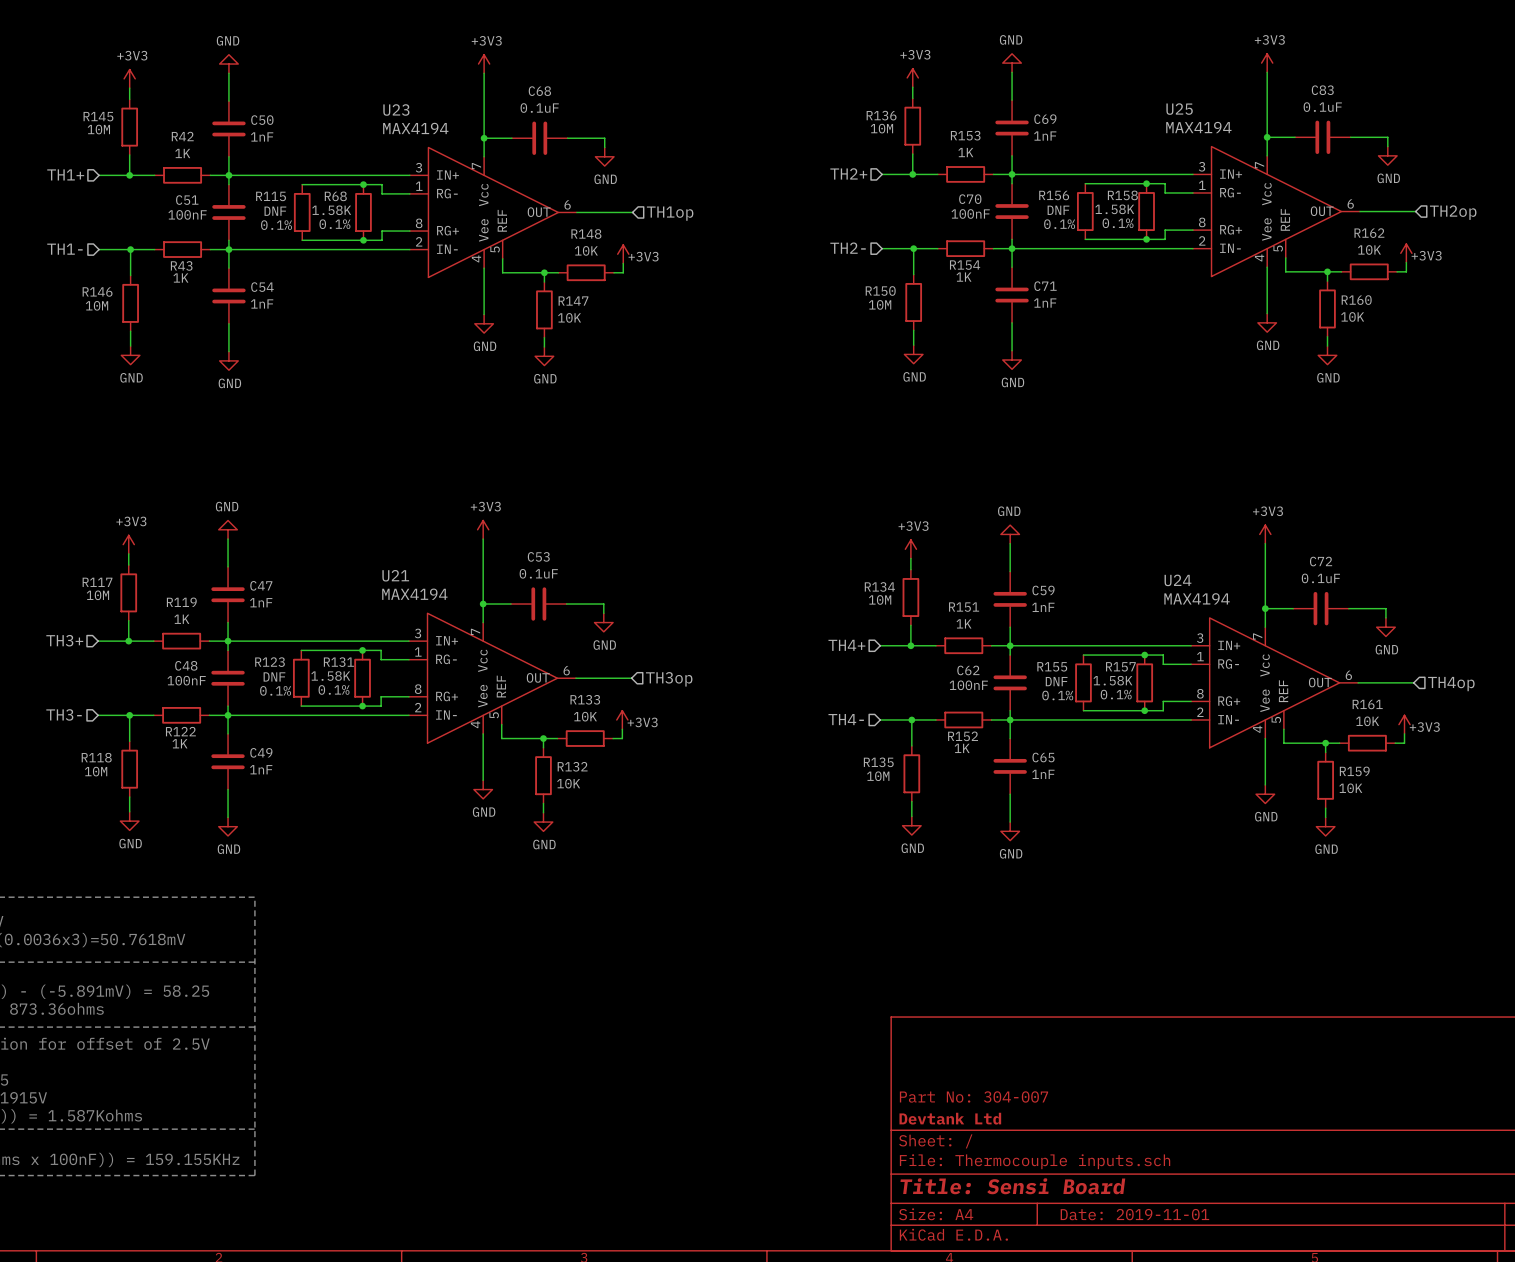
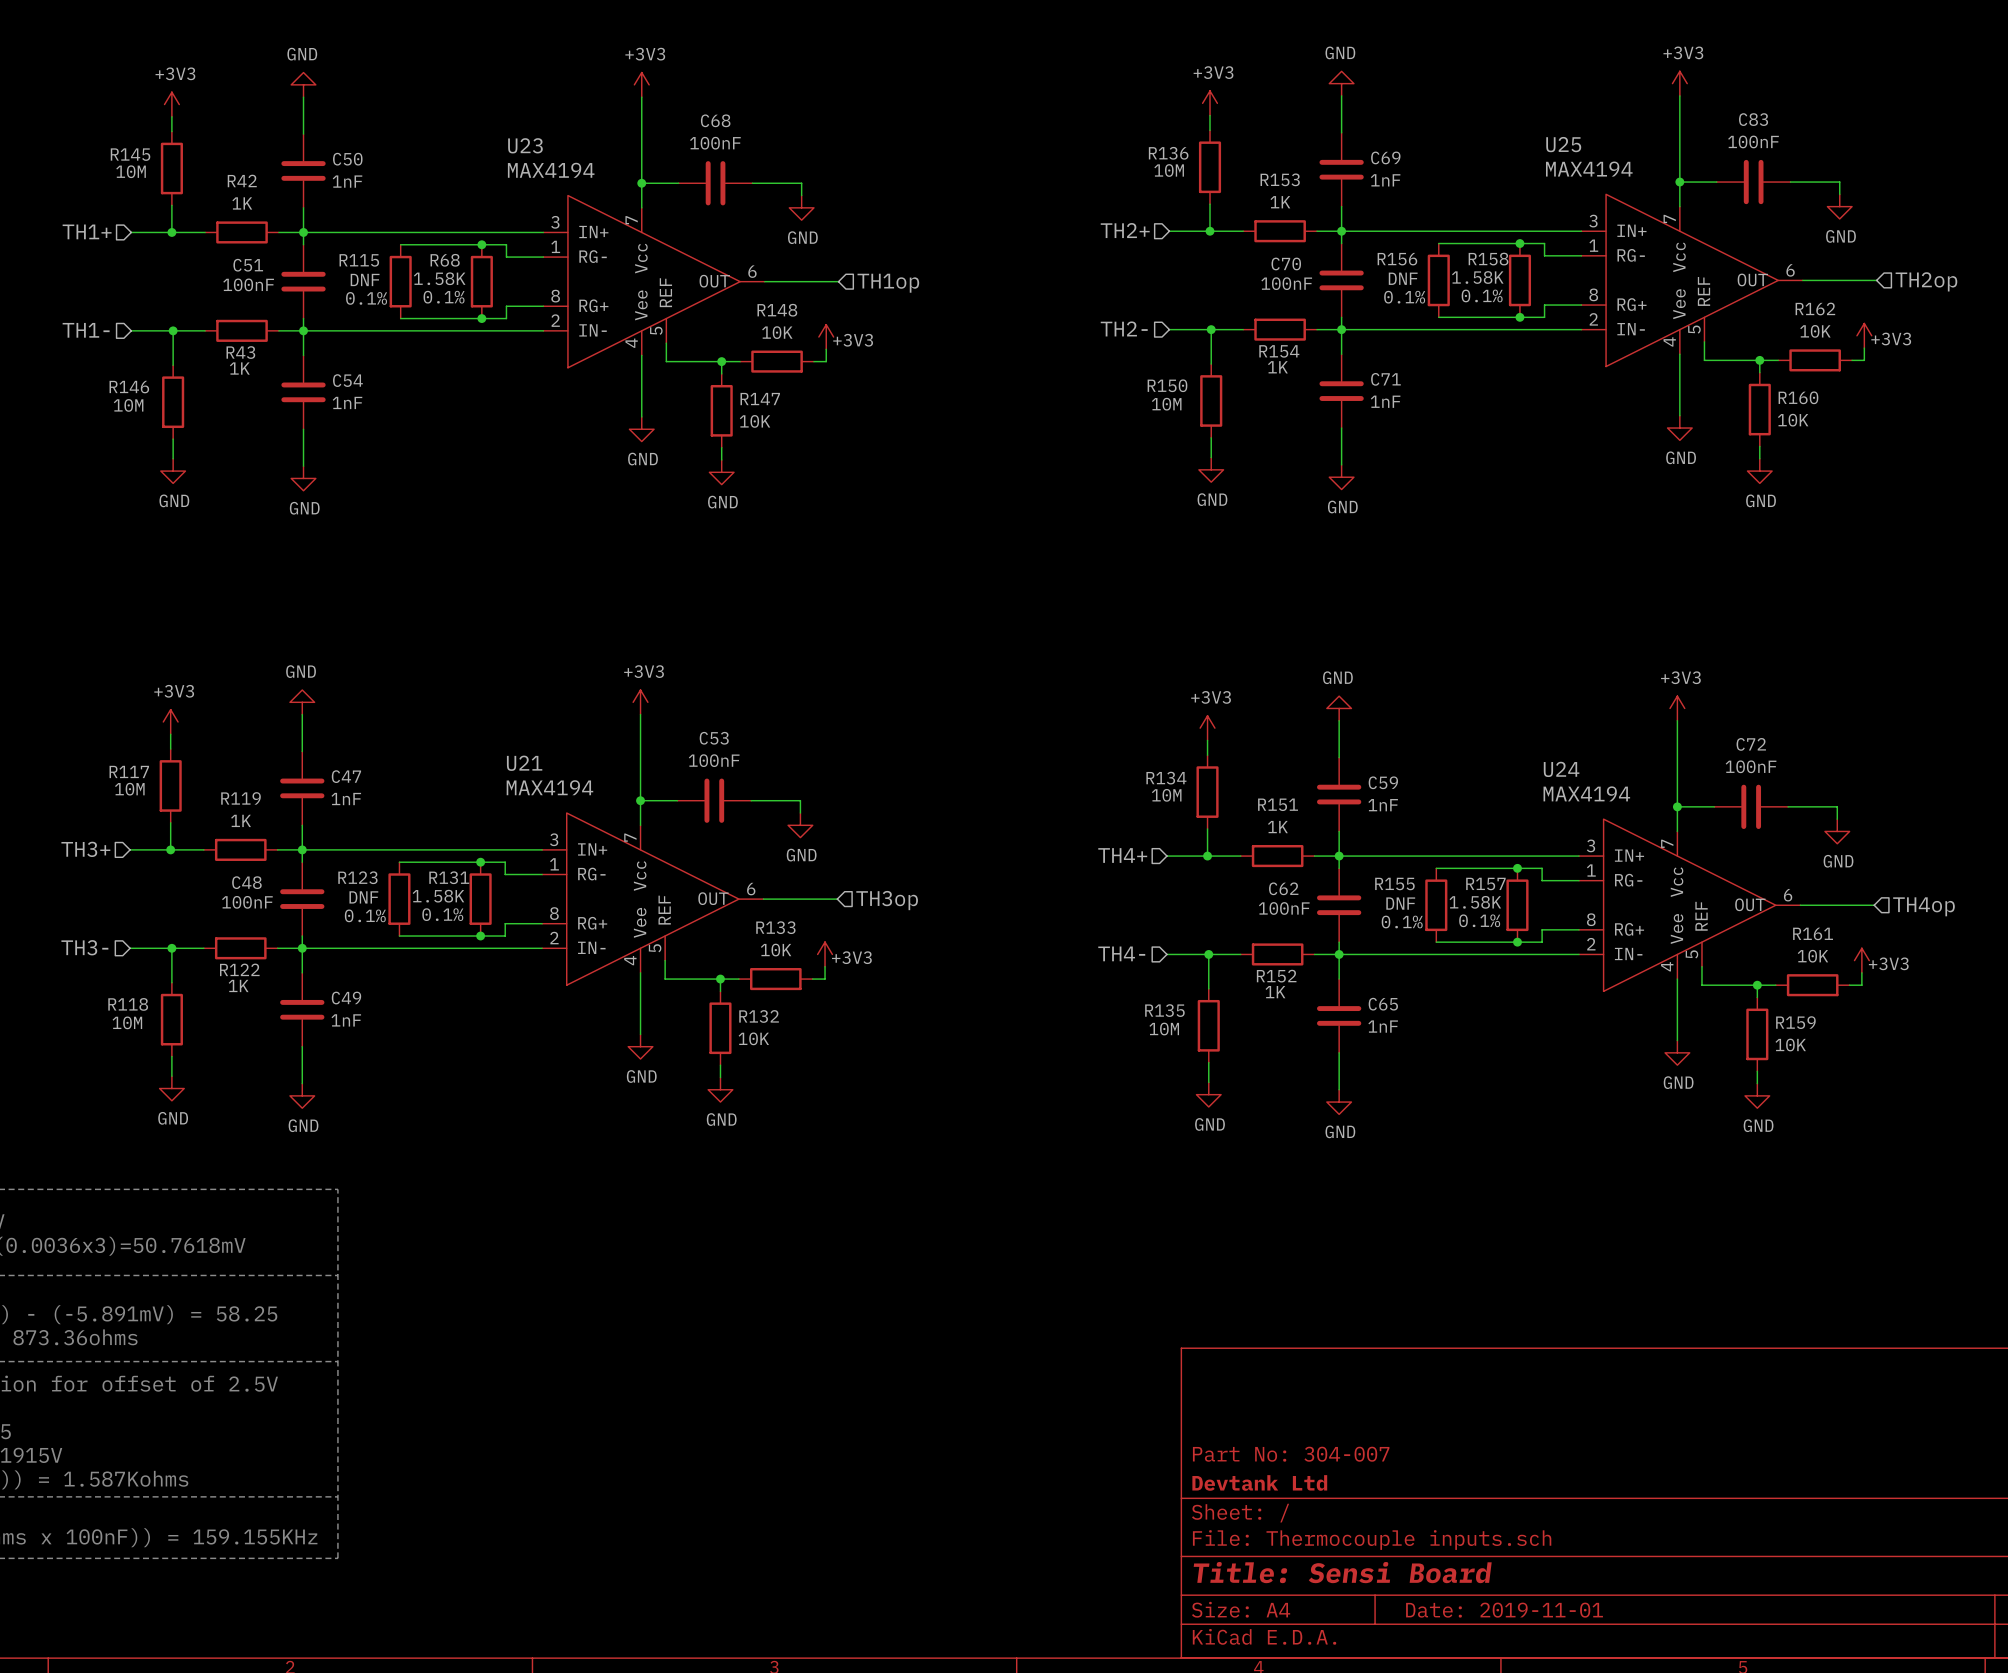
C83 value: 0.1uF (1322, 107) -> 100nF (1753, 141)
C68 value: 0.1uF (539, 108) -> 100nF (715, 143)
C53 value: 0.1uF (538, 573) -> 100nF (714, 760)
C72 value: 0.1uF (1320, 578) -> 100nF (1751, 766)

